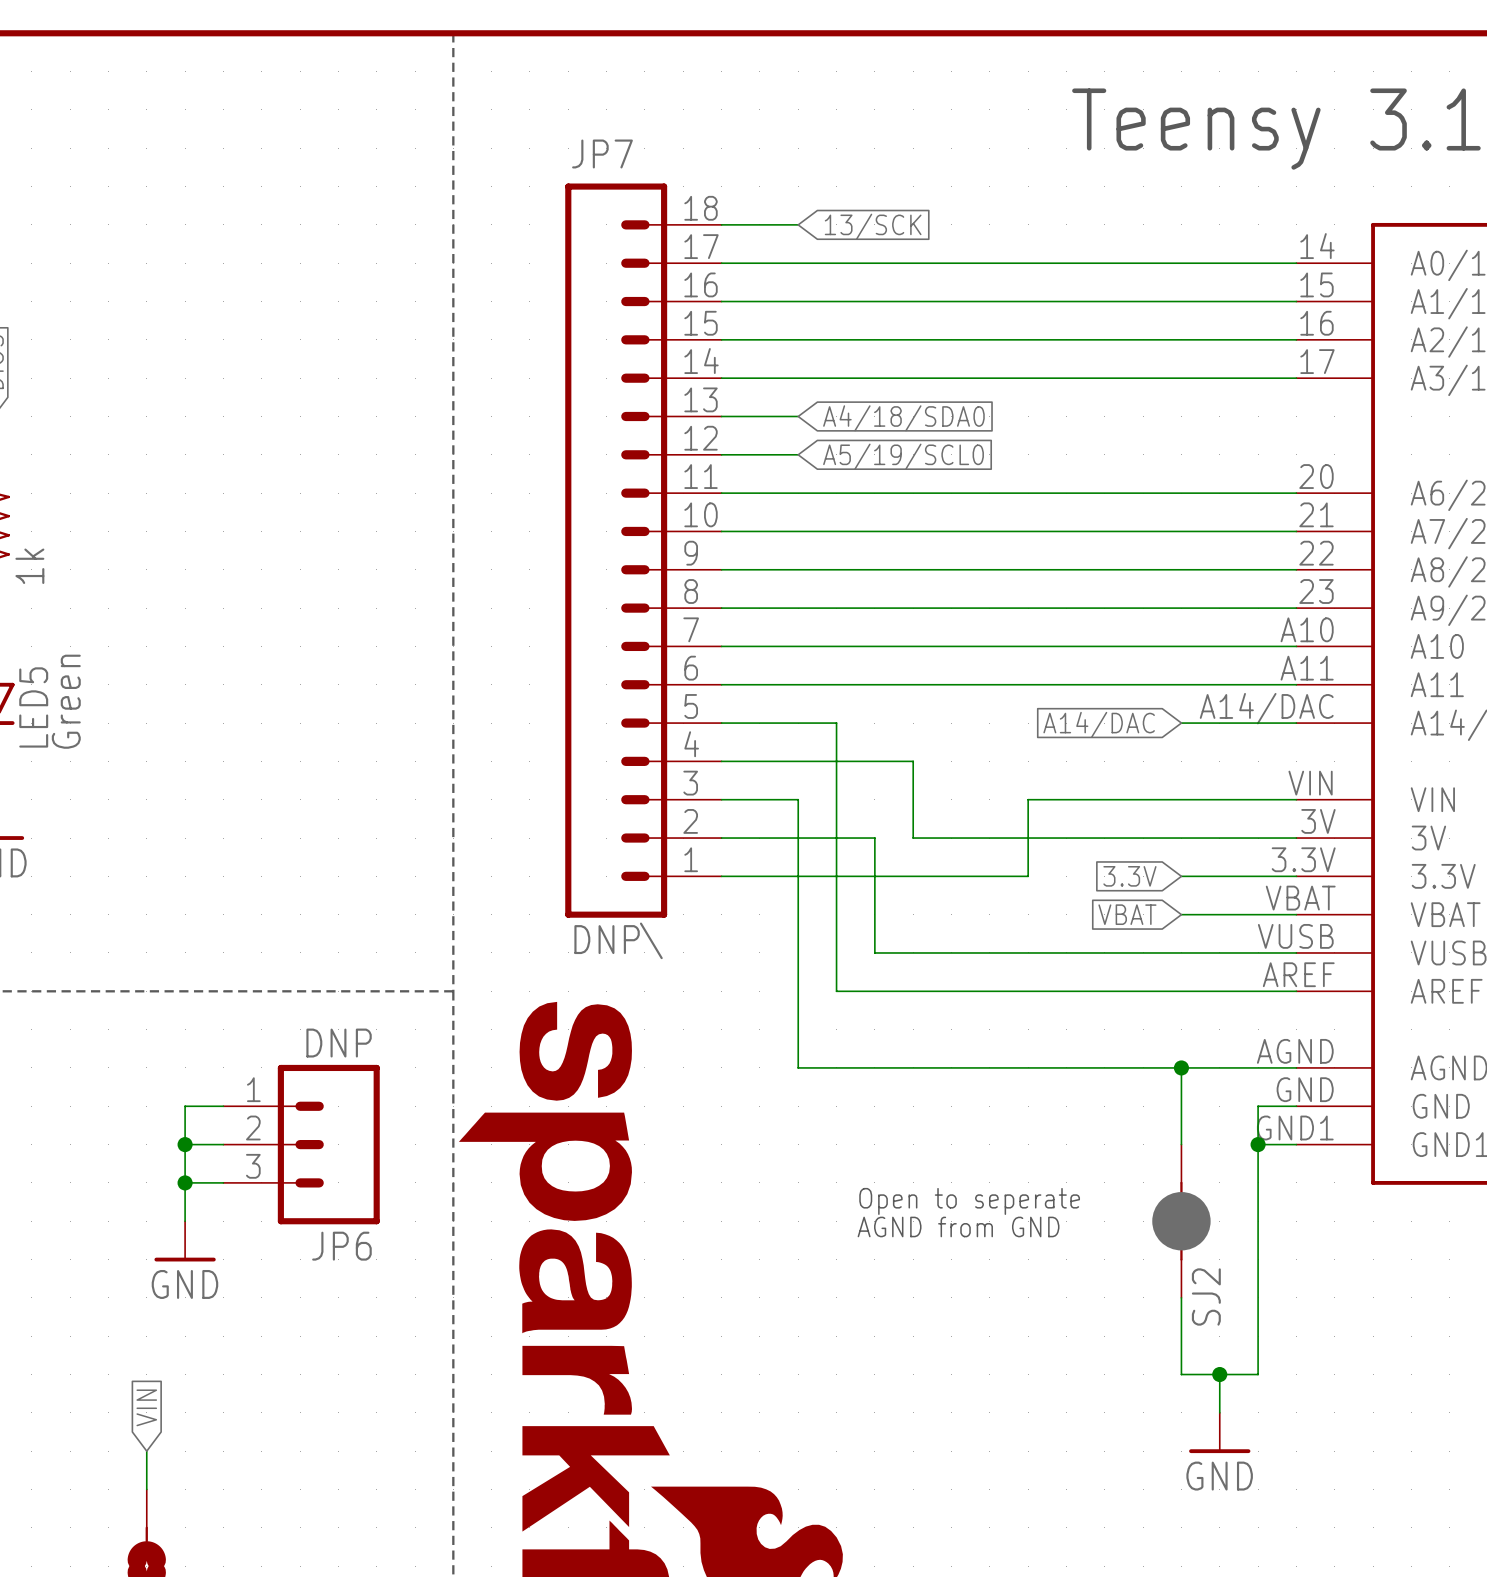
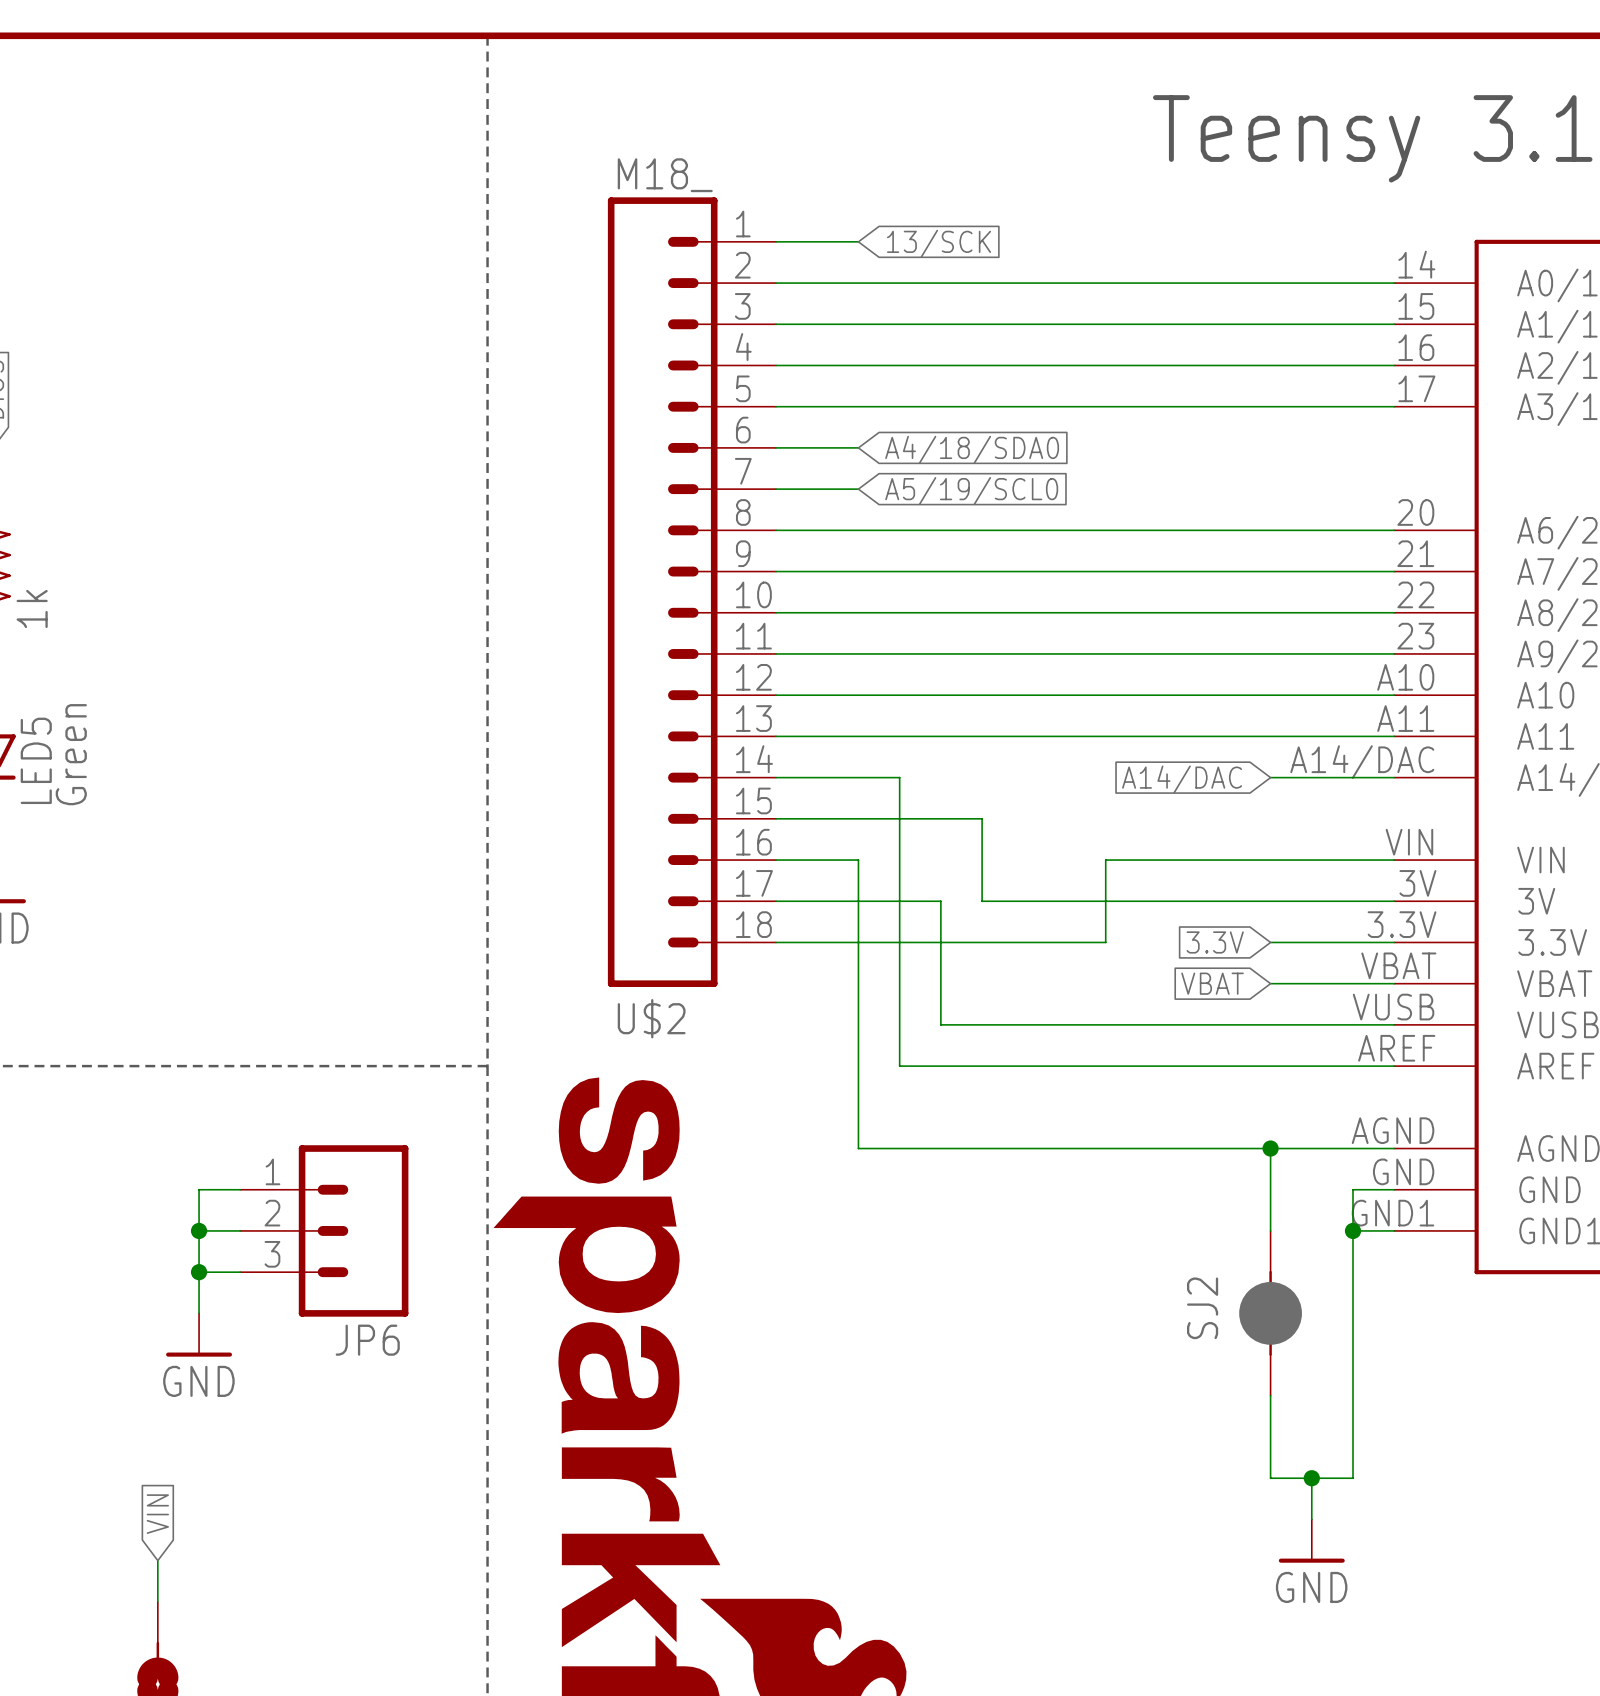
JP7 name: JP7 (602, 153) -> U$2 (651, 1018)
JP7 flip: as is (616, 550) -> up-down (662, 592)
JP7 value: DNP\ (618, 940) -> M18_ (665, 175)
JP6 value: DNP (339, 1043) -> none
text: Open to seperate (969, 1201) -> none
text: AGND from GND (958, 1226) -> none
SJ2 name position: SJ2 (1206, 1296) -> SJ2 (1202, 1308)

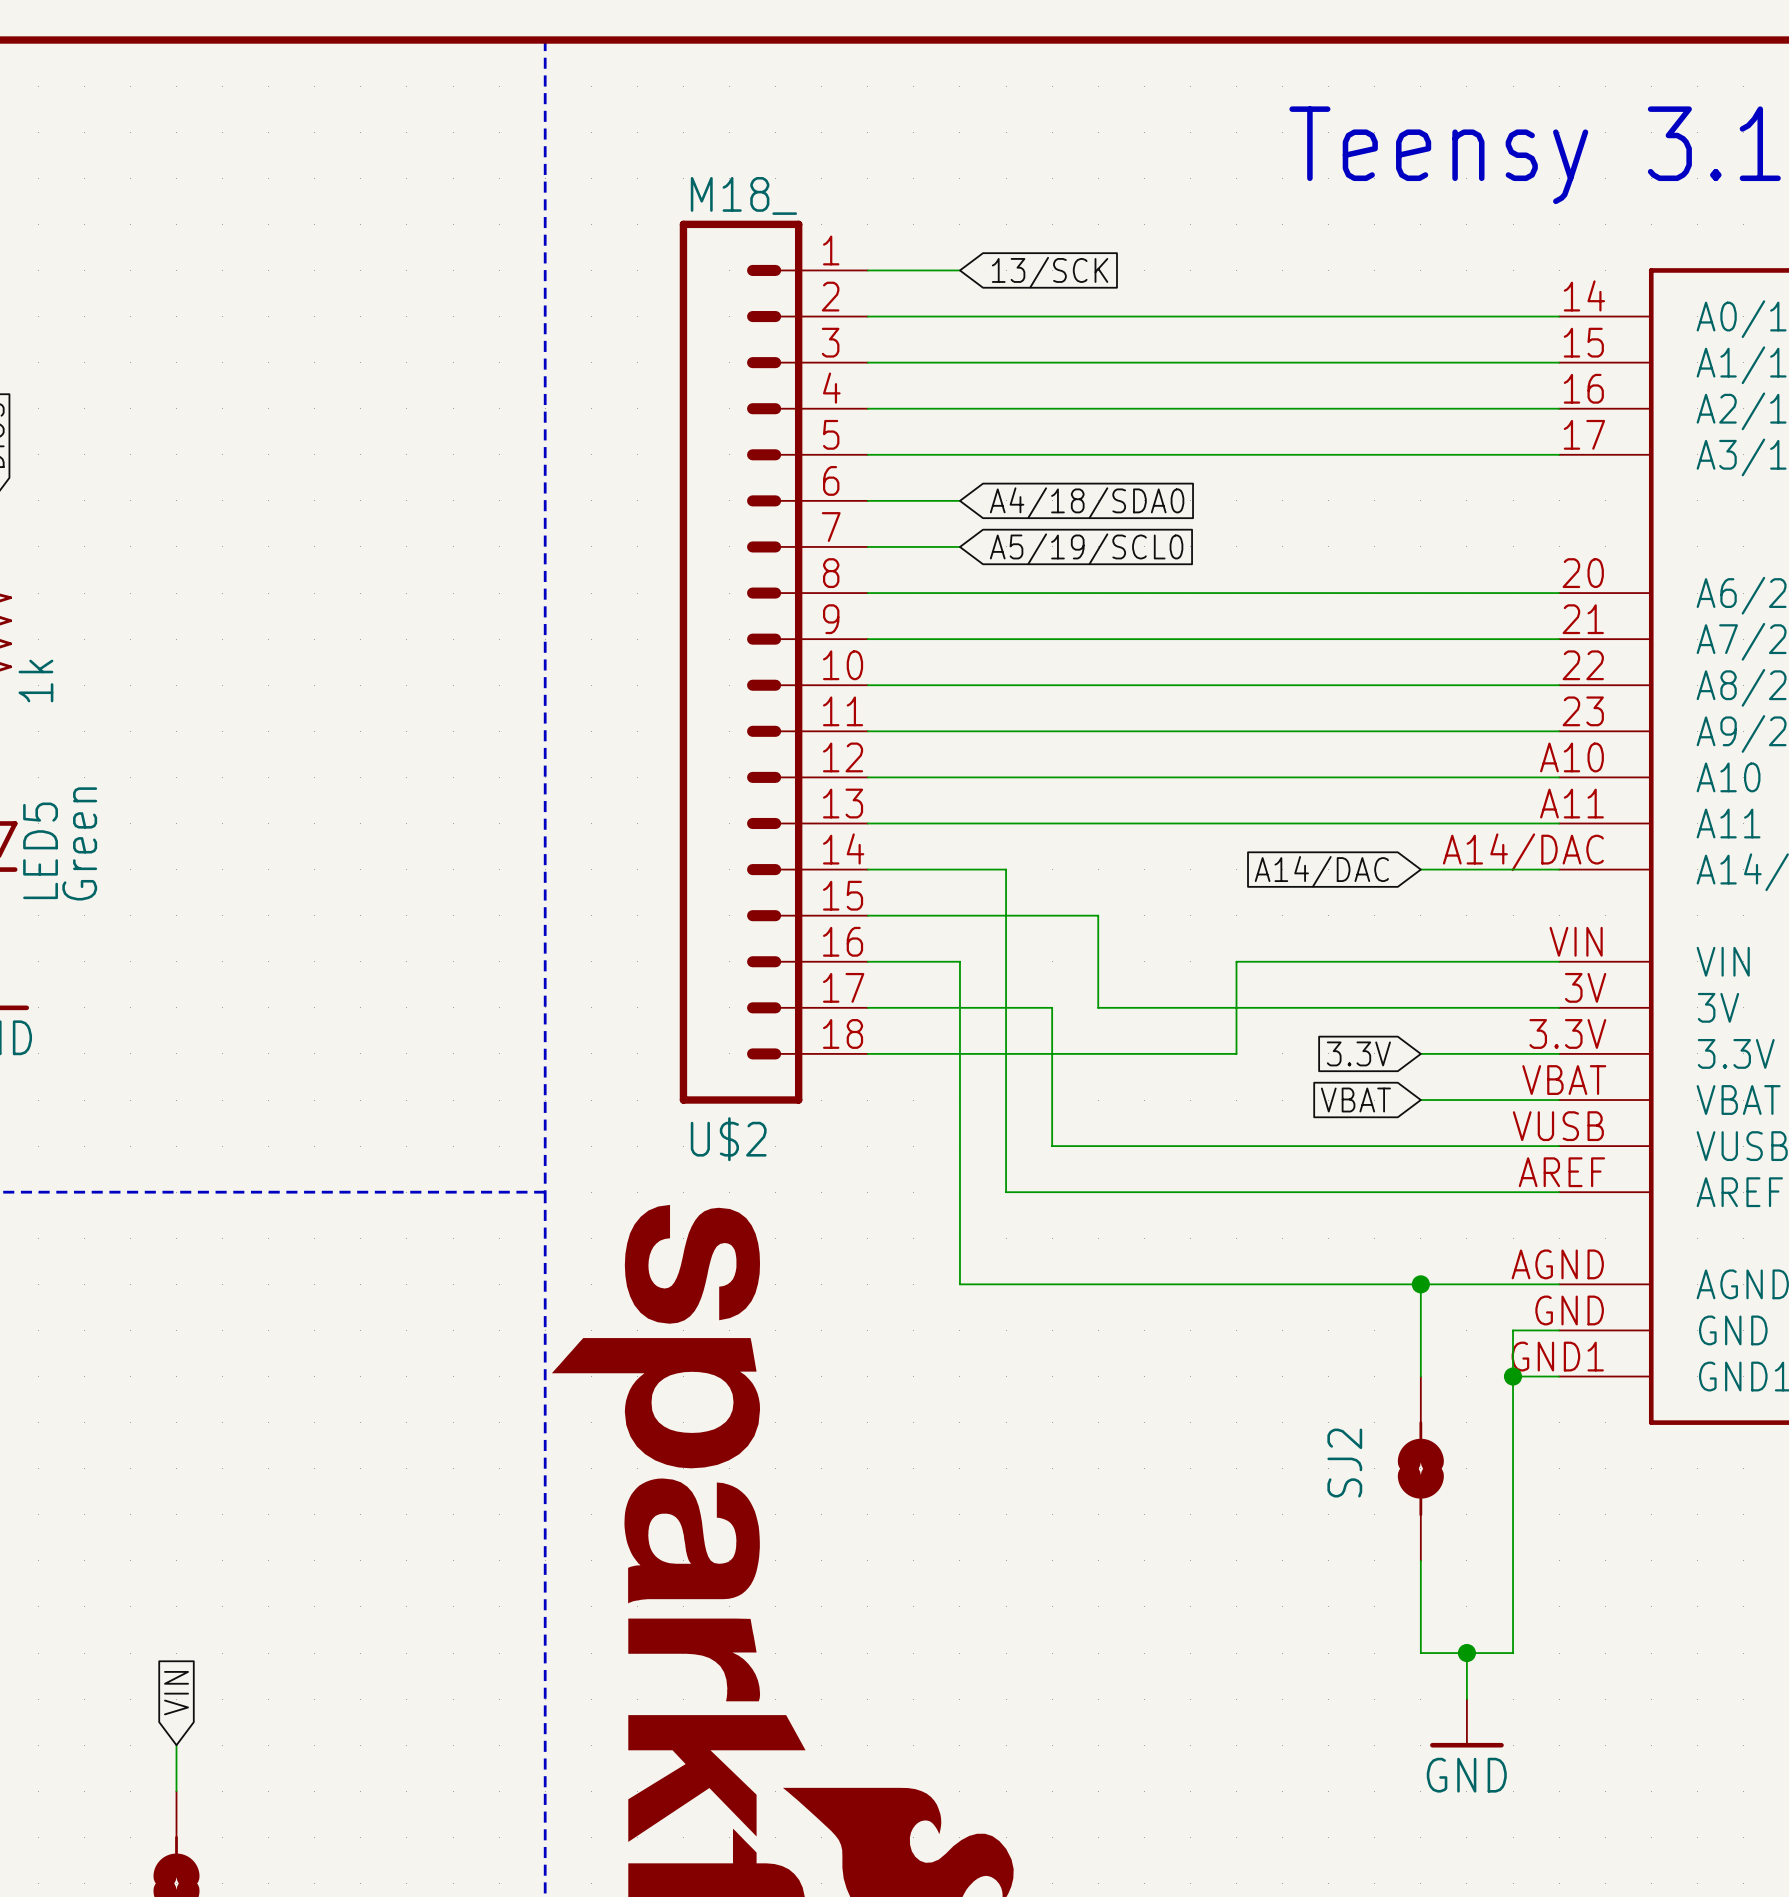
wire: (240, 1189) (199, 1189) (199, 1313) -> none
wire: (199, 1230) (240, 1230) -> none
junction: (199, 1230) -> none
JP6: (324, 1230) -> none
SJ2 symbol: [1239, 1230, 1302, 1396] -> [1397, 1376, 1444, 1561]
wire: (199, 1272) (240, 1272) -> none
junction: (199, 1272) -> none
power symbol: GND (199, 1335) -> none

